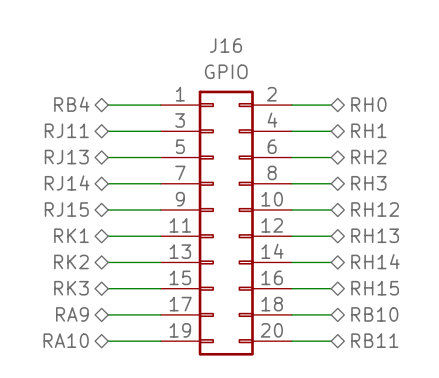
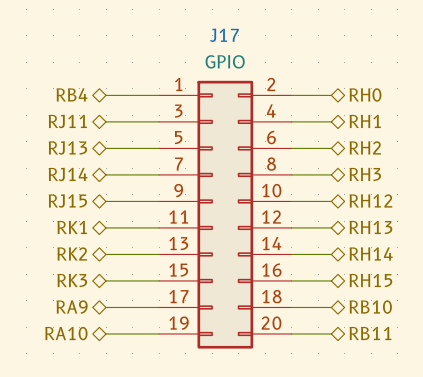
J16 name: J16 (225, 45) -> J17 (224, 35)

